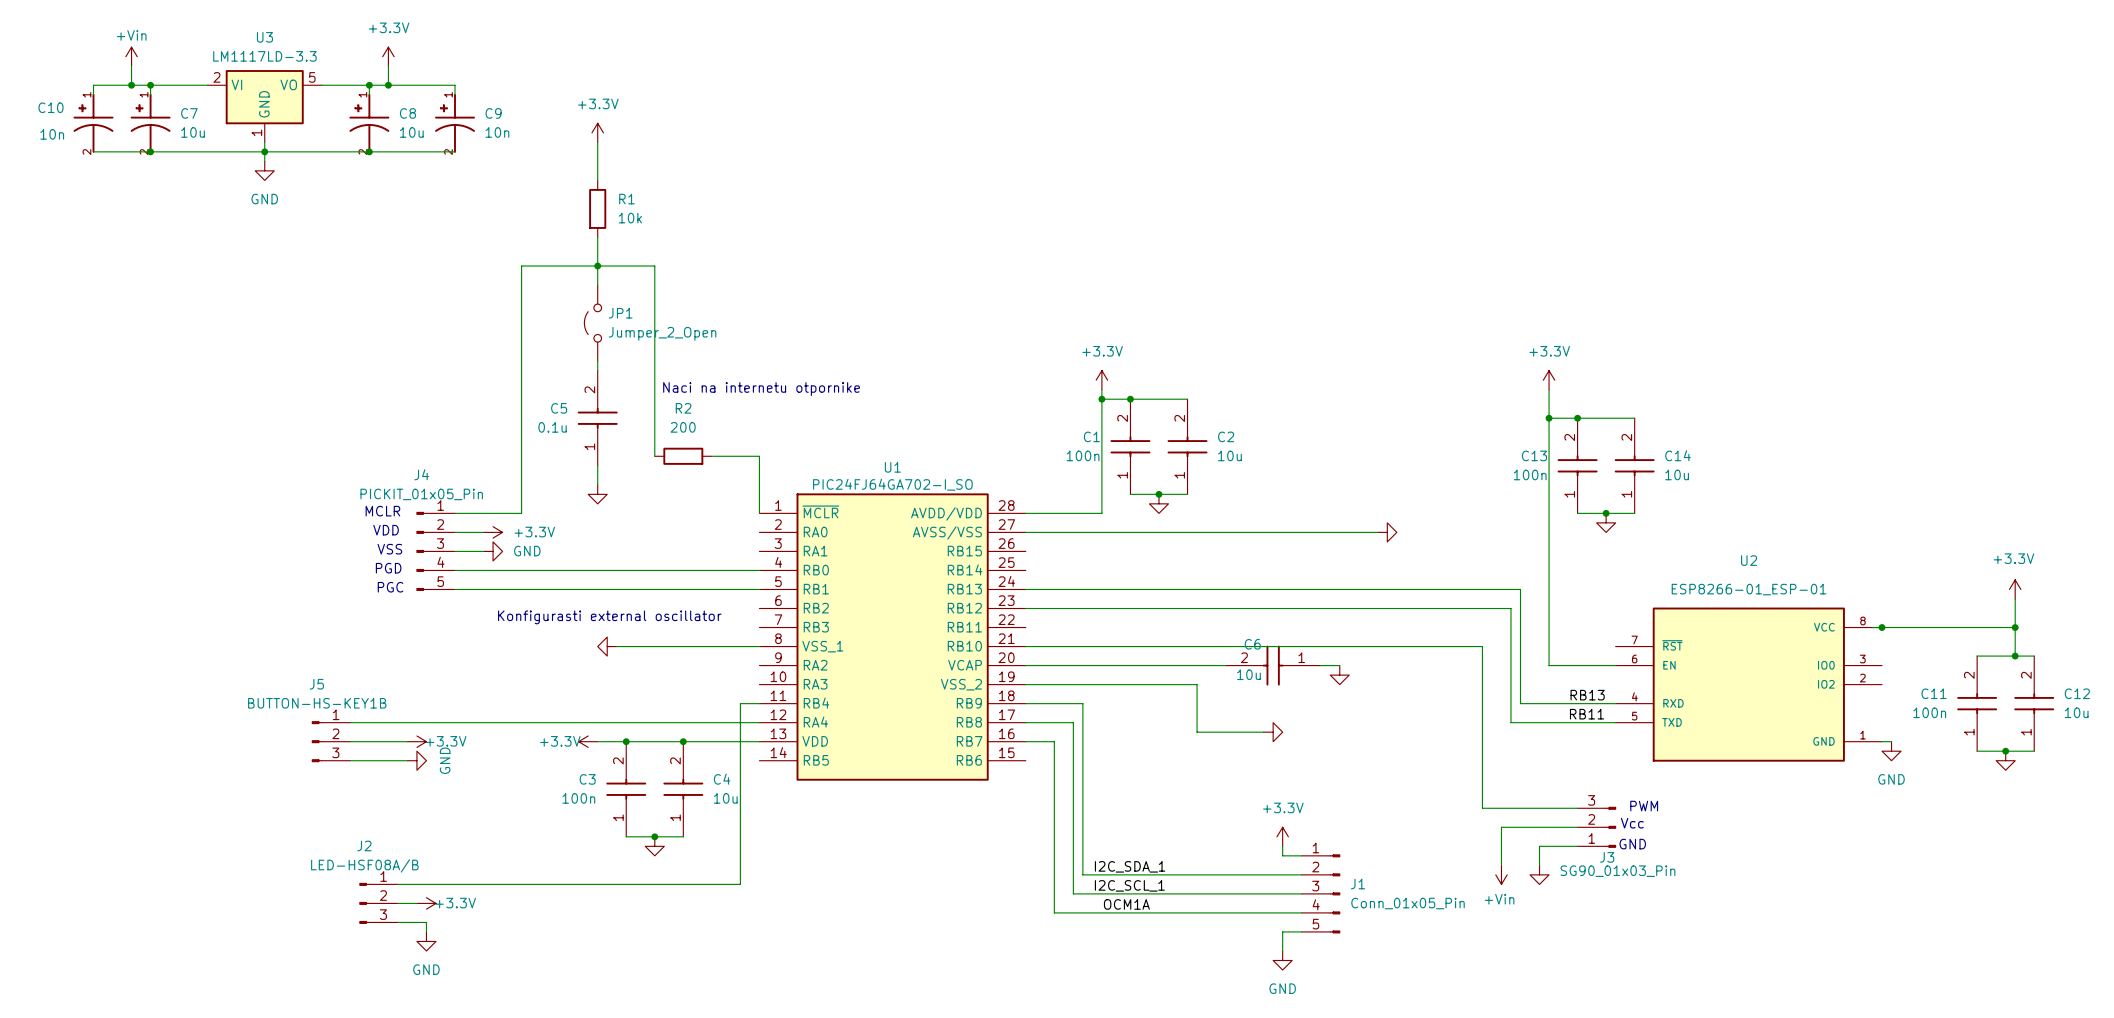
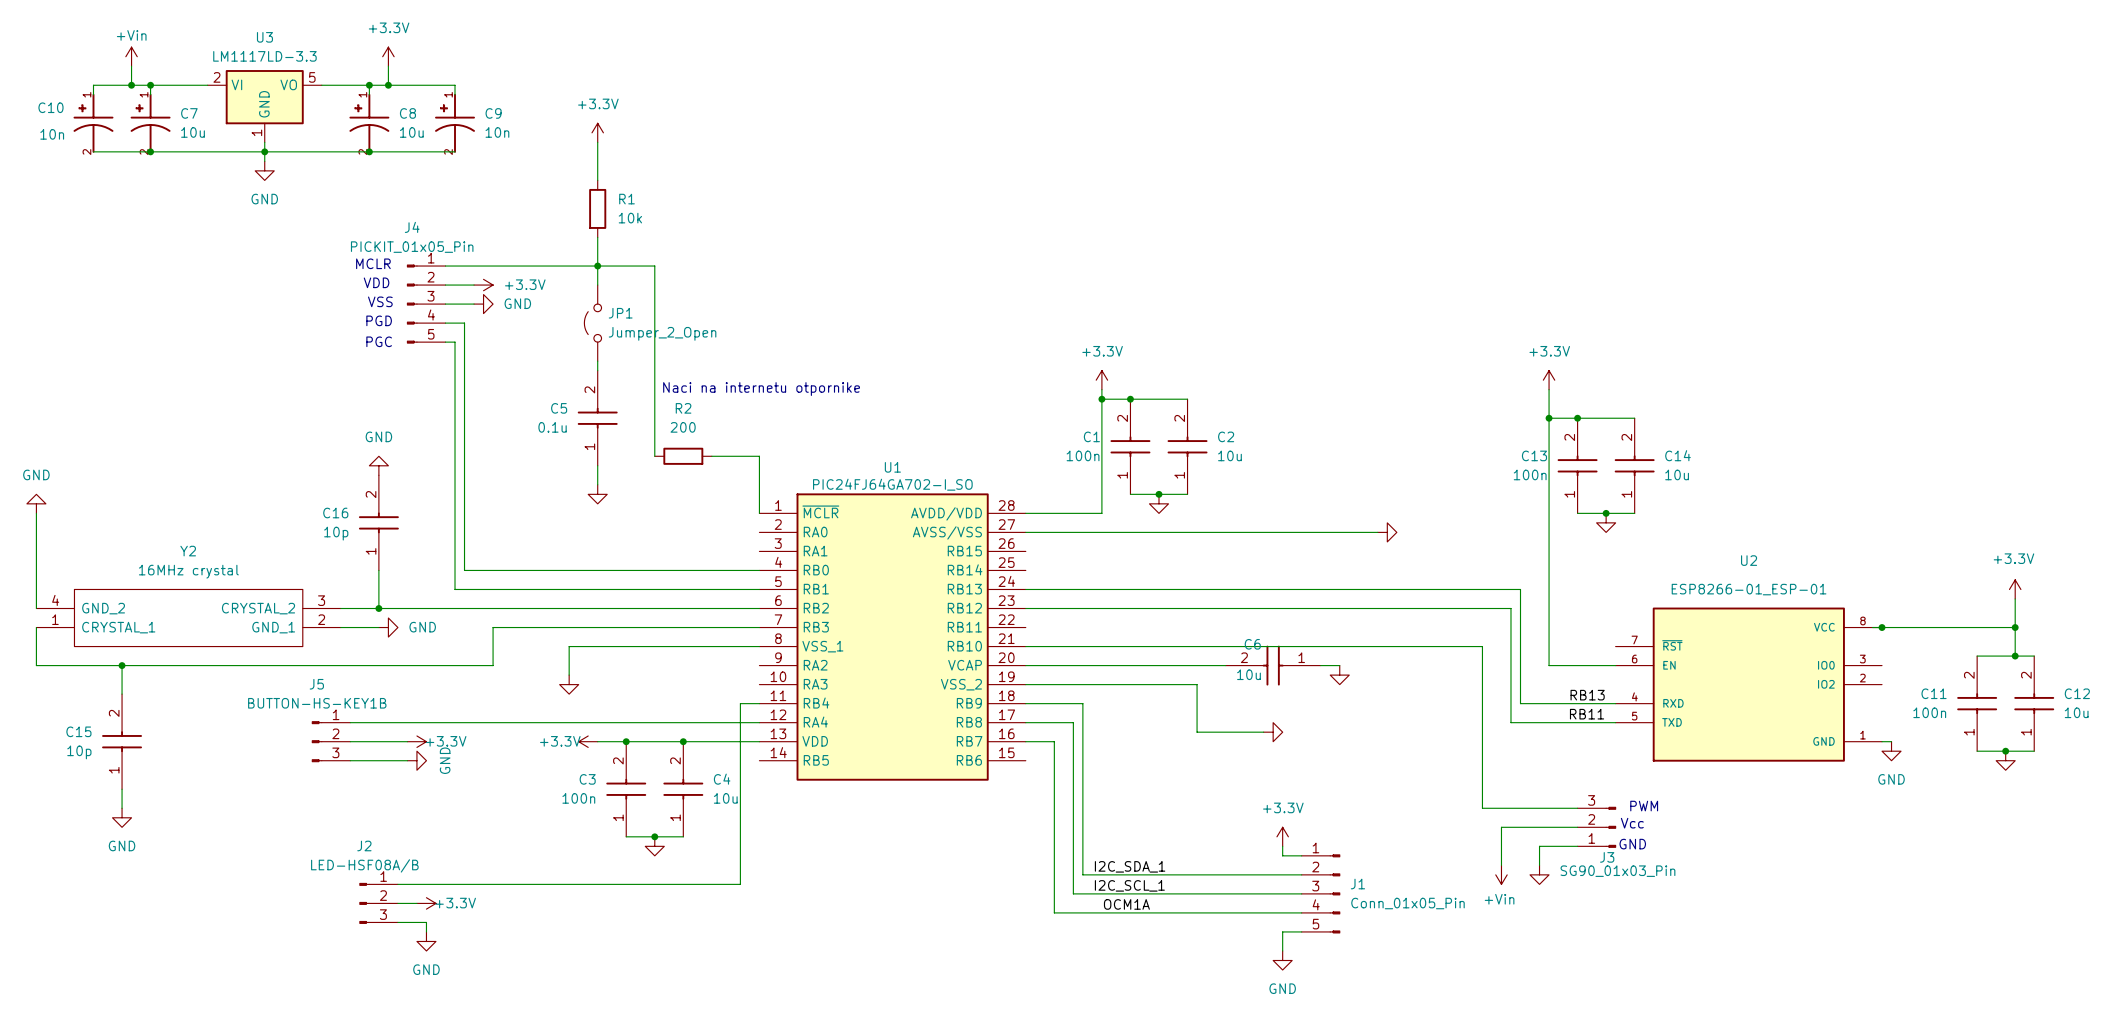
text: none -> MCLR (373, 263)
wire: (521, 266) (521, 513) (455, 513) -> (521, 266) (445, 266)
text: none -> VDD (376, 282)
wire: none -> (445, 285) (474, 285)
power symbol: none -> +3.3V (483, 285)
text: none -> VSS (380, 301)
wire: none -> (445, 304) (474, 304)
power symbol: none -> GND (483, 304)
text: none -> PGD (379, 320)
text: none -> PGC (379, 341)
wire: none -> (445, 342) (455, 342) (455, 589)
power symbol: none -> GND (378, 465)
power symbol: none -> GND (36, 503)
text: MCLR (382, 511) -> none
wire: none -> (36, 513) (36, 608)
C16: none -> 10p (378, 522)
text: VDD (386, 530) -> none
wire: (455, 532) (483, 532) -> none
power symbol: +3.3V (493, 532) -> none
text: VSS (389, 549) -> none
J4 position: (435, 551) -> (426, 304)
wire: (455, 551) (483, 551) -> none
power symbol: GND (493, 551) -> none
text: PGD (388, 568) -> none
wire: none -> (378, 570) (378, 608)
wire: (455, 570) (464, 570) -> (445, 323) (464, 323) (464, 570)
text: PGC (390, 587) -> none
wire: none -> (340, 608) (759, 608)
junction: none -> (378, 608)
text: Konfigurasti external oscillator (609, 617) -> none
Y2: none -> 16MHz crystal (188, 618)
wire: none -> (36, 627) (36, 665) (493, 665) (493, 627) (759, 627)
wire: none -> (340, 627) (378, 627)
power symbol: none -> GND (388, 627)
power symbol rotation: 0° (607, 646) -> 90° counterclockwise (569, 684)
power symbol position: (607, 646) -> (569, 684)
wire: none -> (616, 646) (569, 646) (569, 675)
wire: none -> (122, 665) (122, 694)
junction: none -> (122, 665)
C15: none -> 10p (122, 741)
wire: none -> (122, 789) (122, 808)
power symbol: none -> GND (122, 817)

